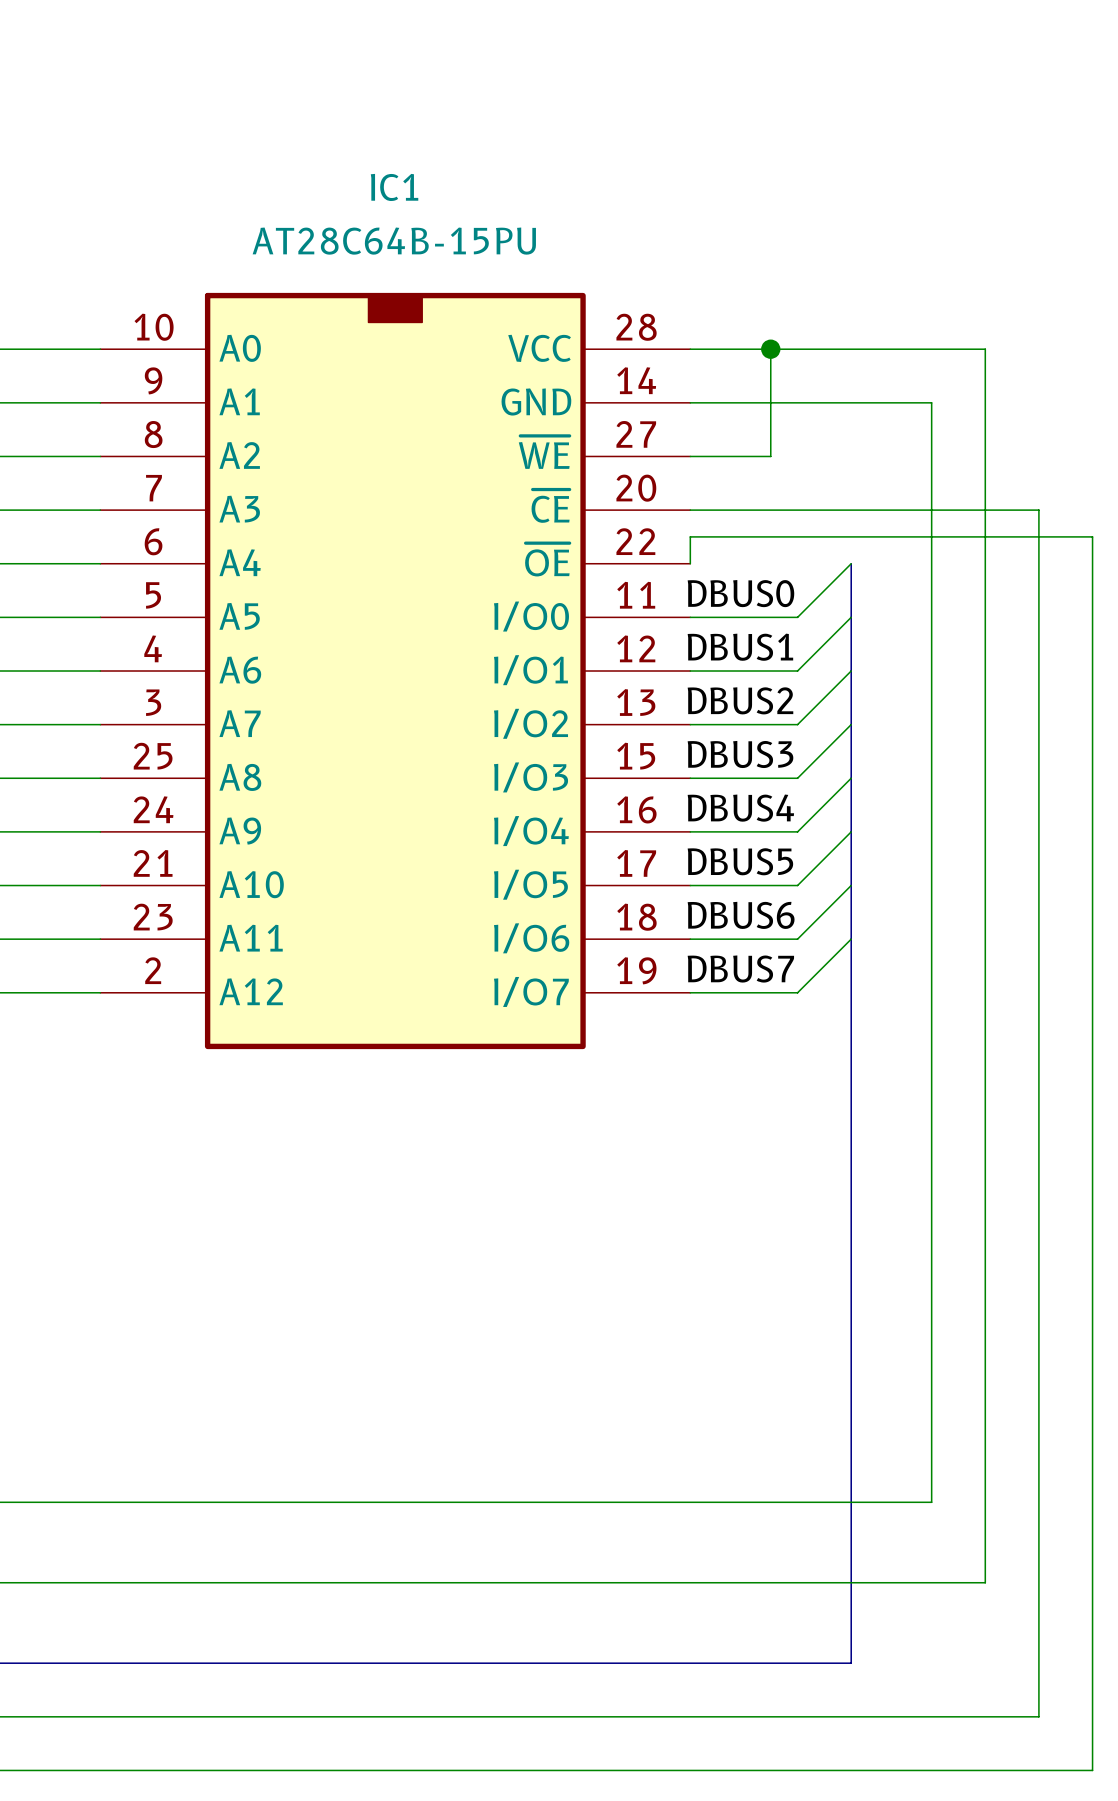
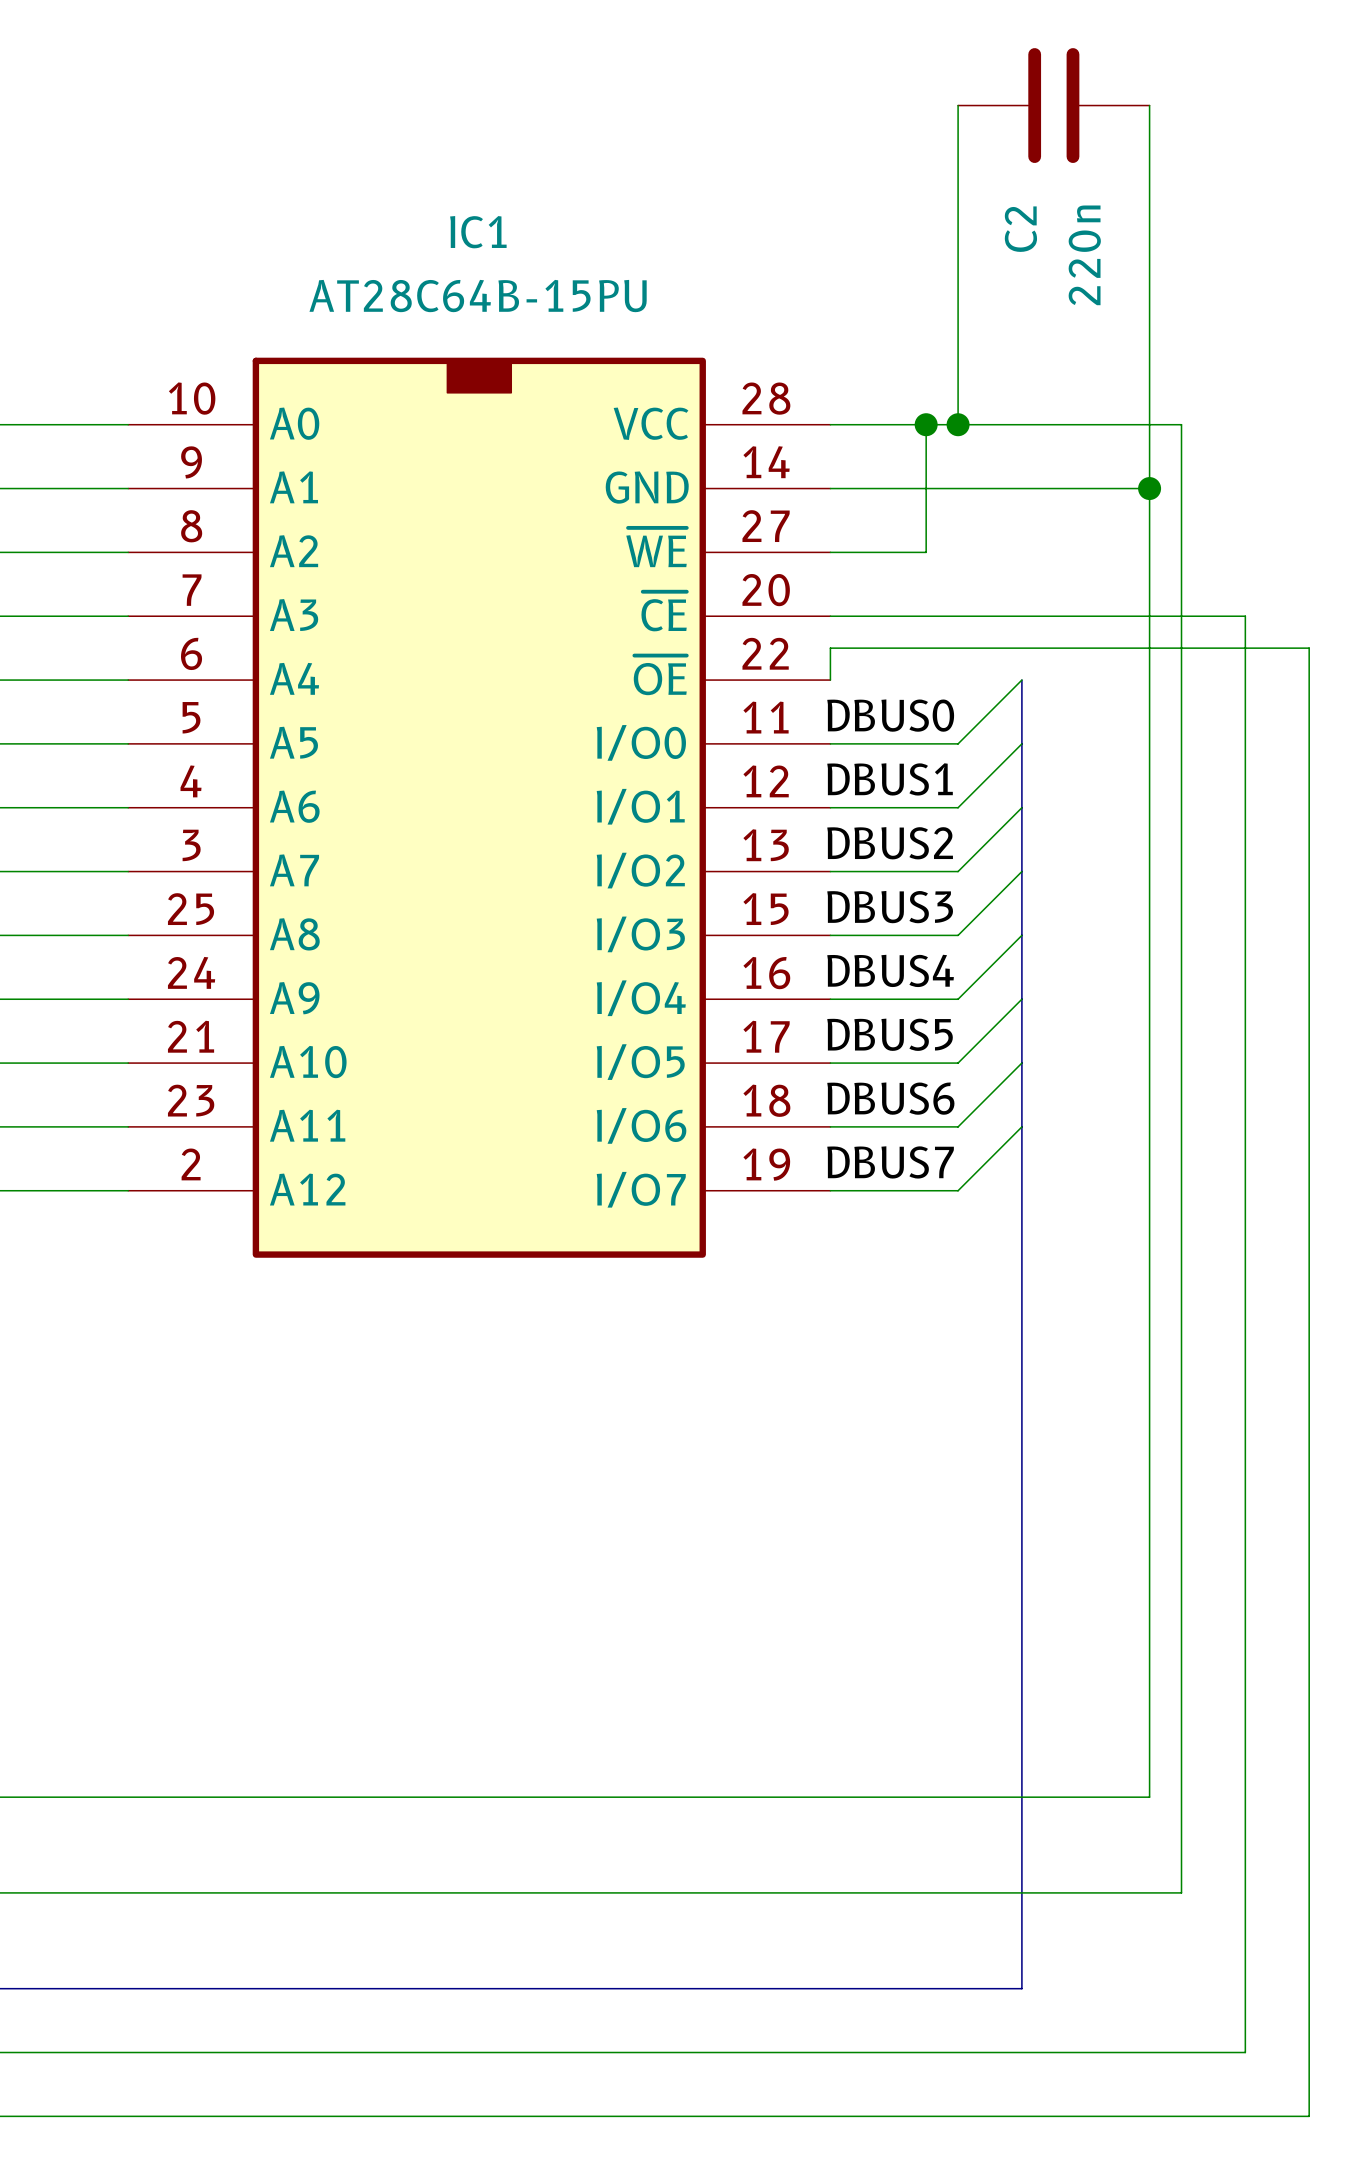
wire: none -> (958, 105) (958, 424)
C2: none -> 220n (1053, 105)
junction: none -> (958, 424)
wire: (931, 402) (931, 1502) -> (1149, 105) (1149, 1797) (1117, 1797)
wire: none -> (1117, 488) (1149, 488)
junction: none -> (1149, 488)

